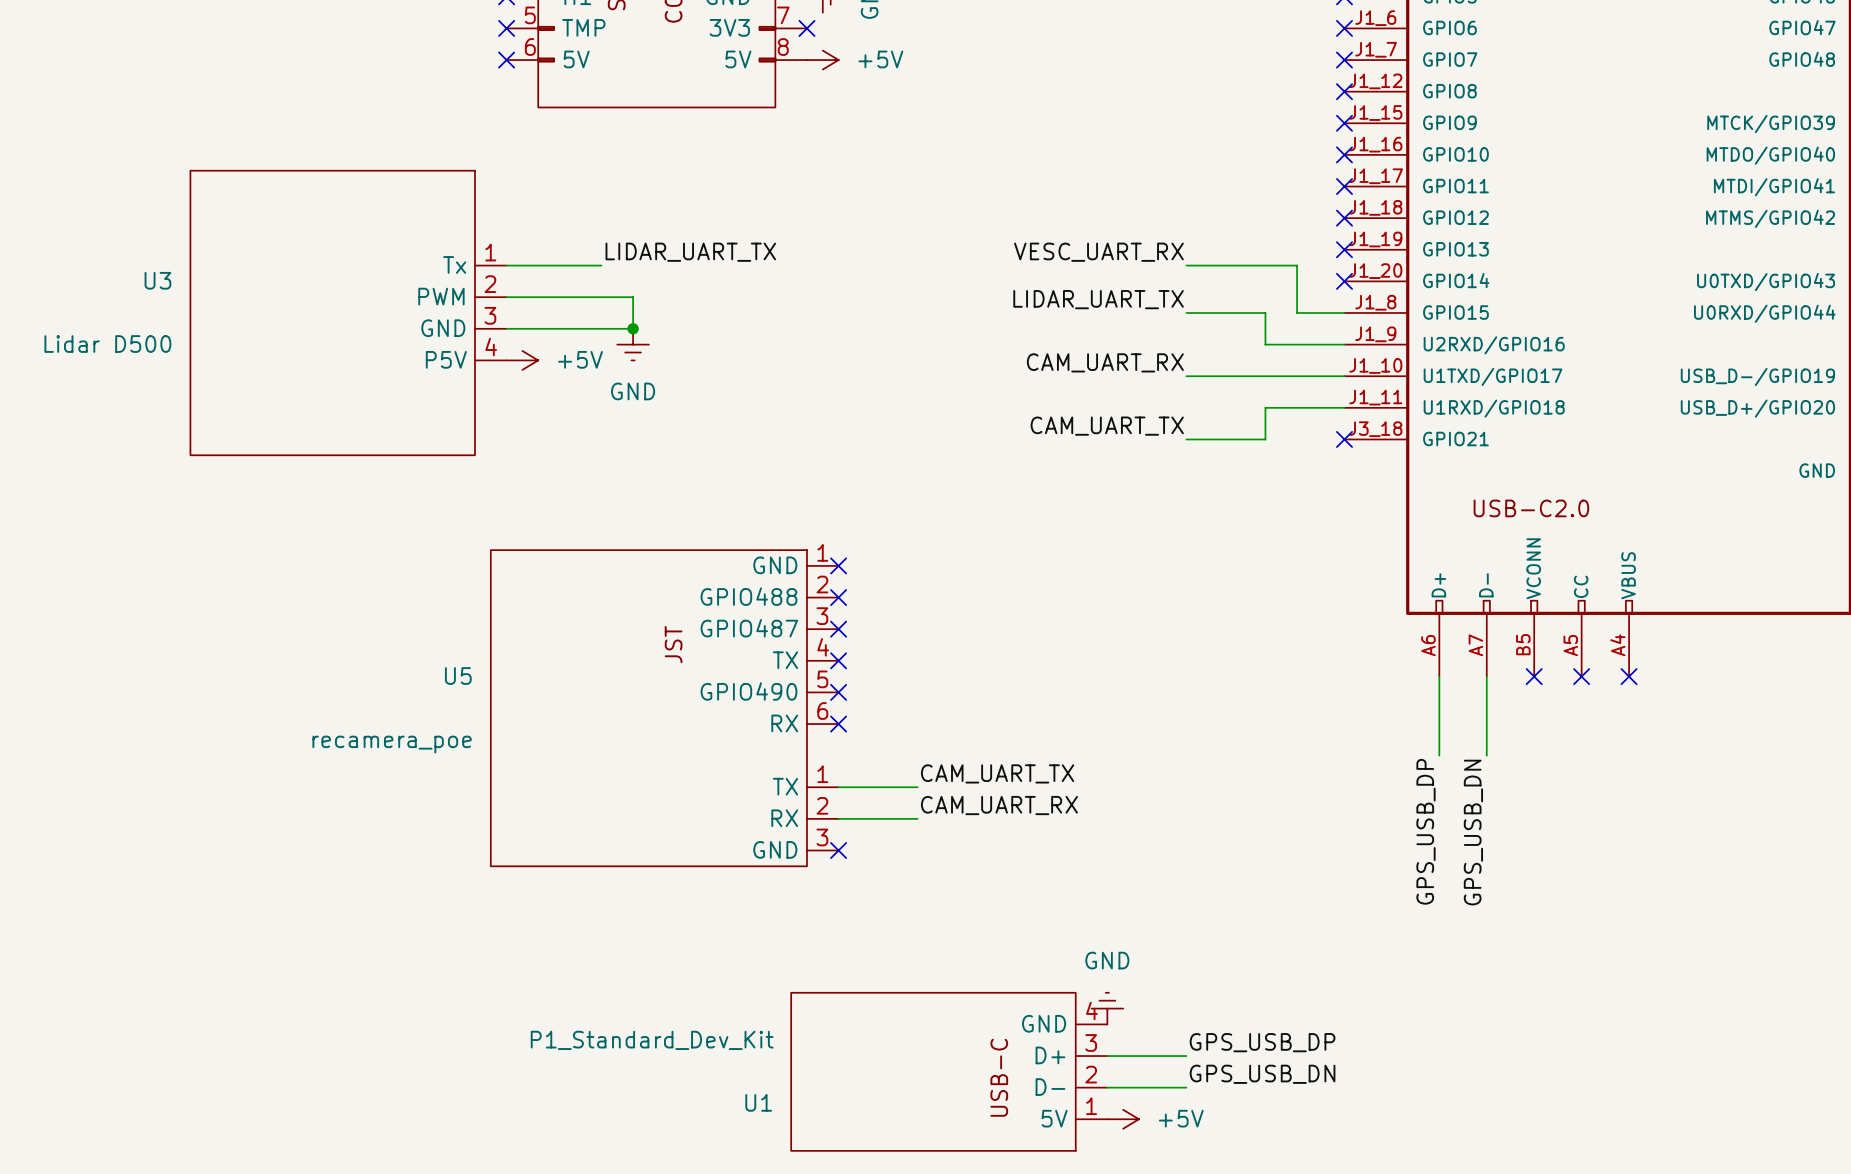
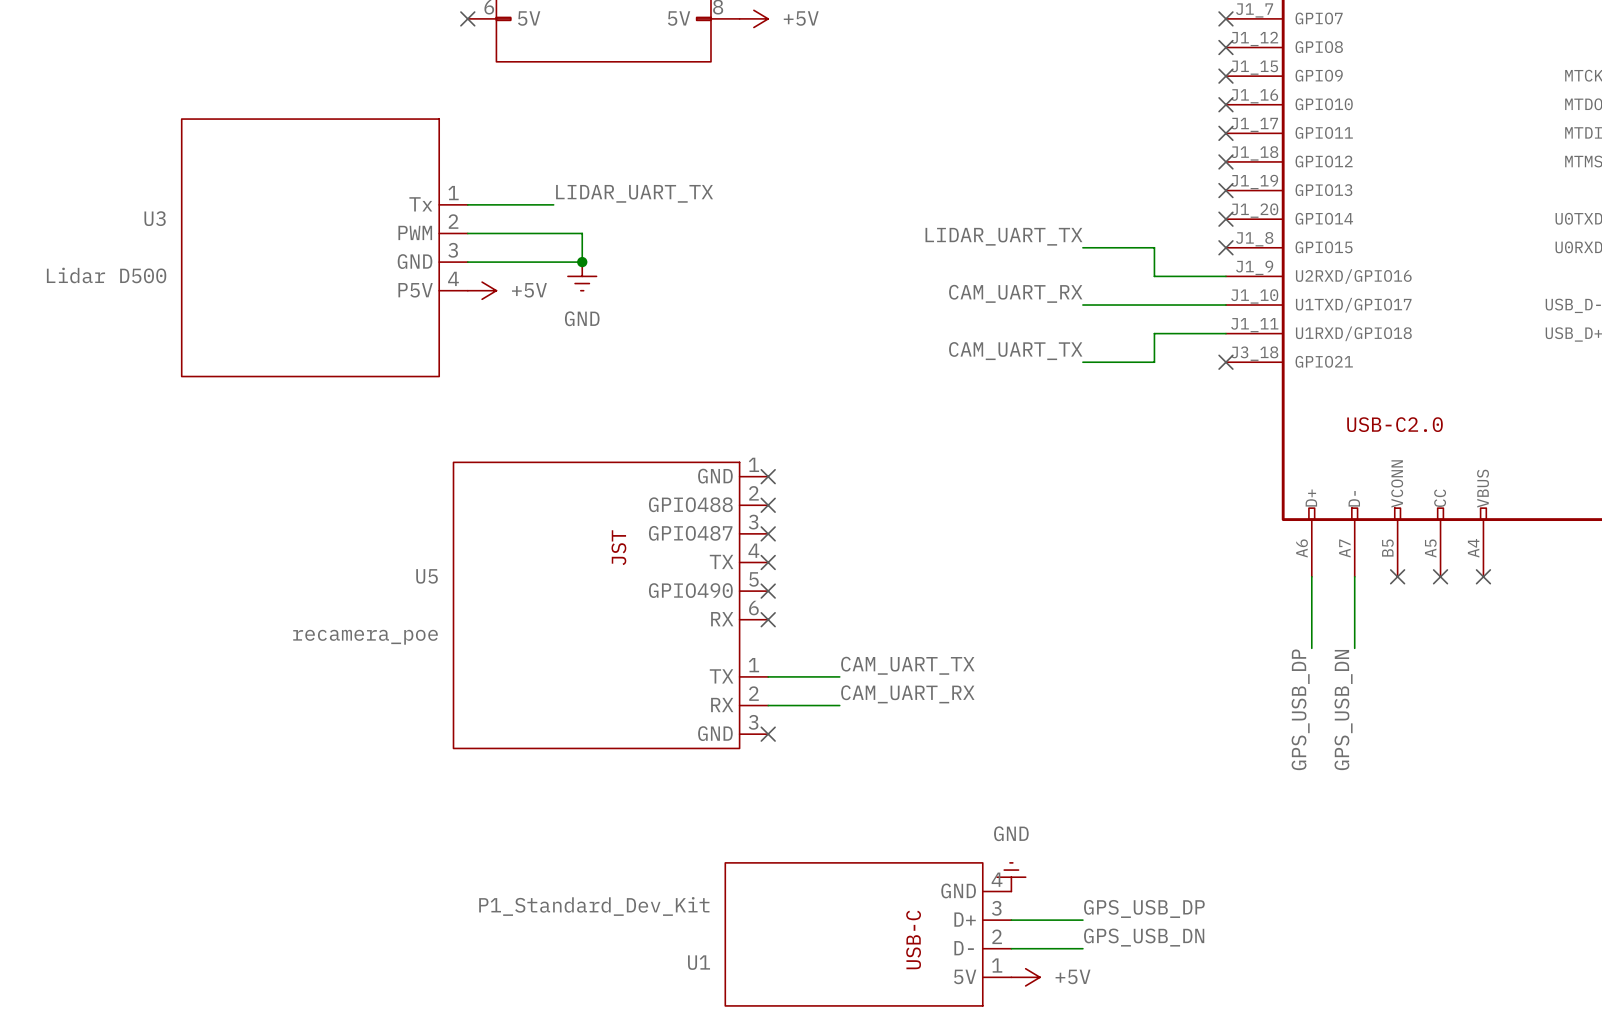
label: VESC_UART_RX (1098, 252) -> none
wire: (1186, 265) (1297, 265) (1297, 312) (1344, 312) -> none
no-connect mark: none -> (1225, 247)

